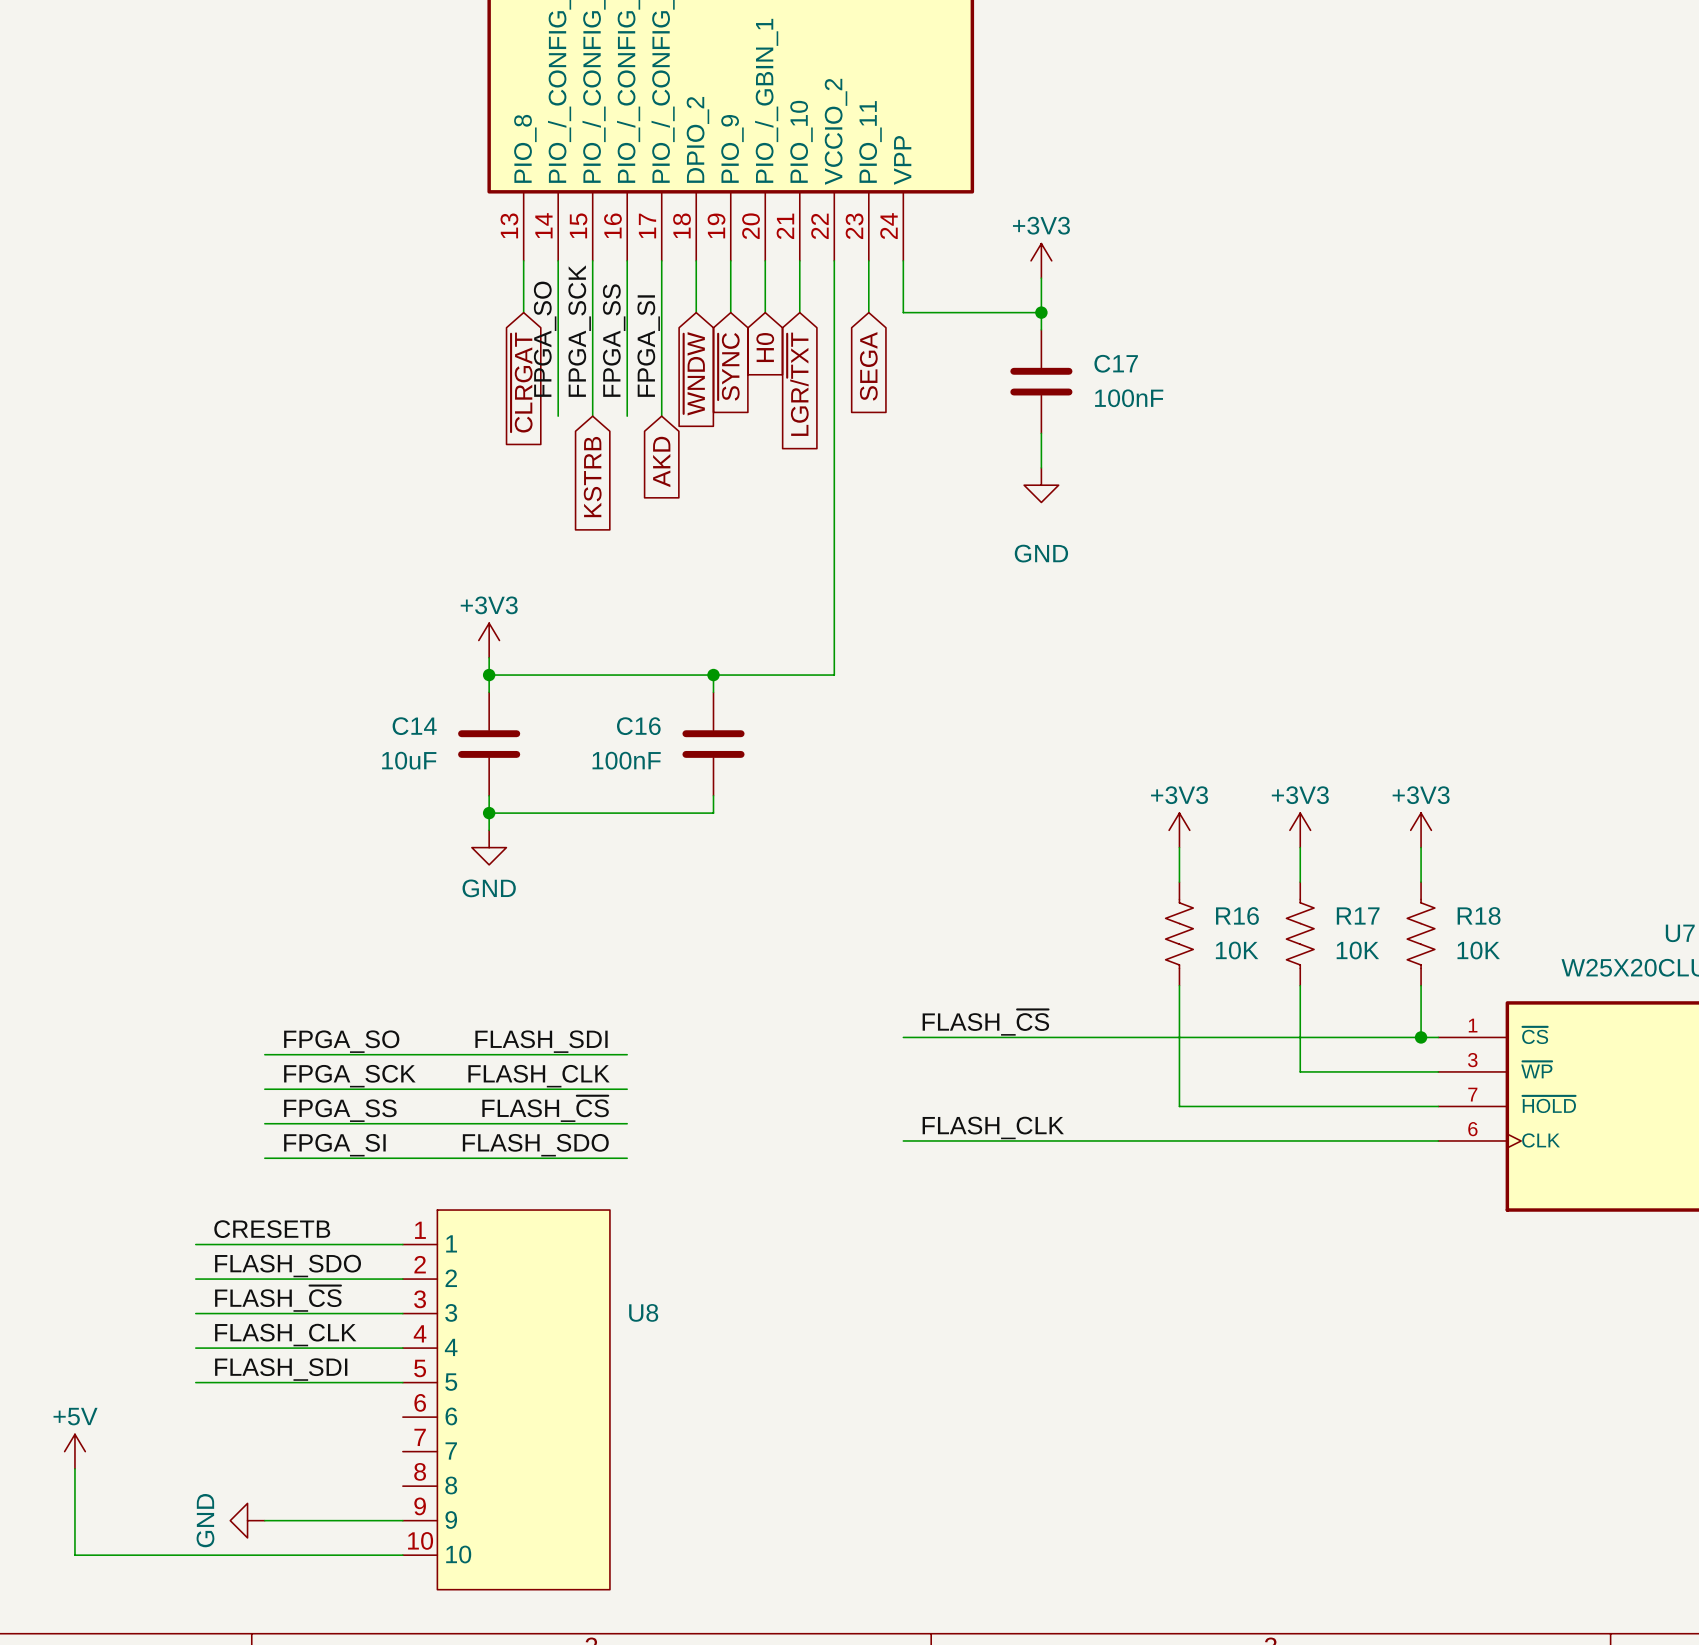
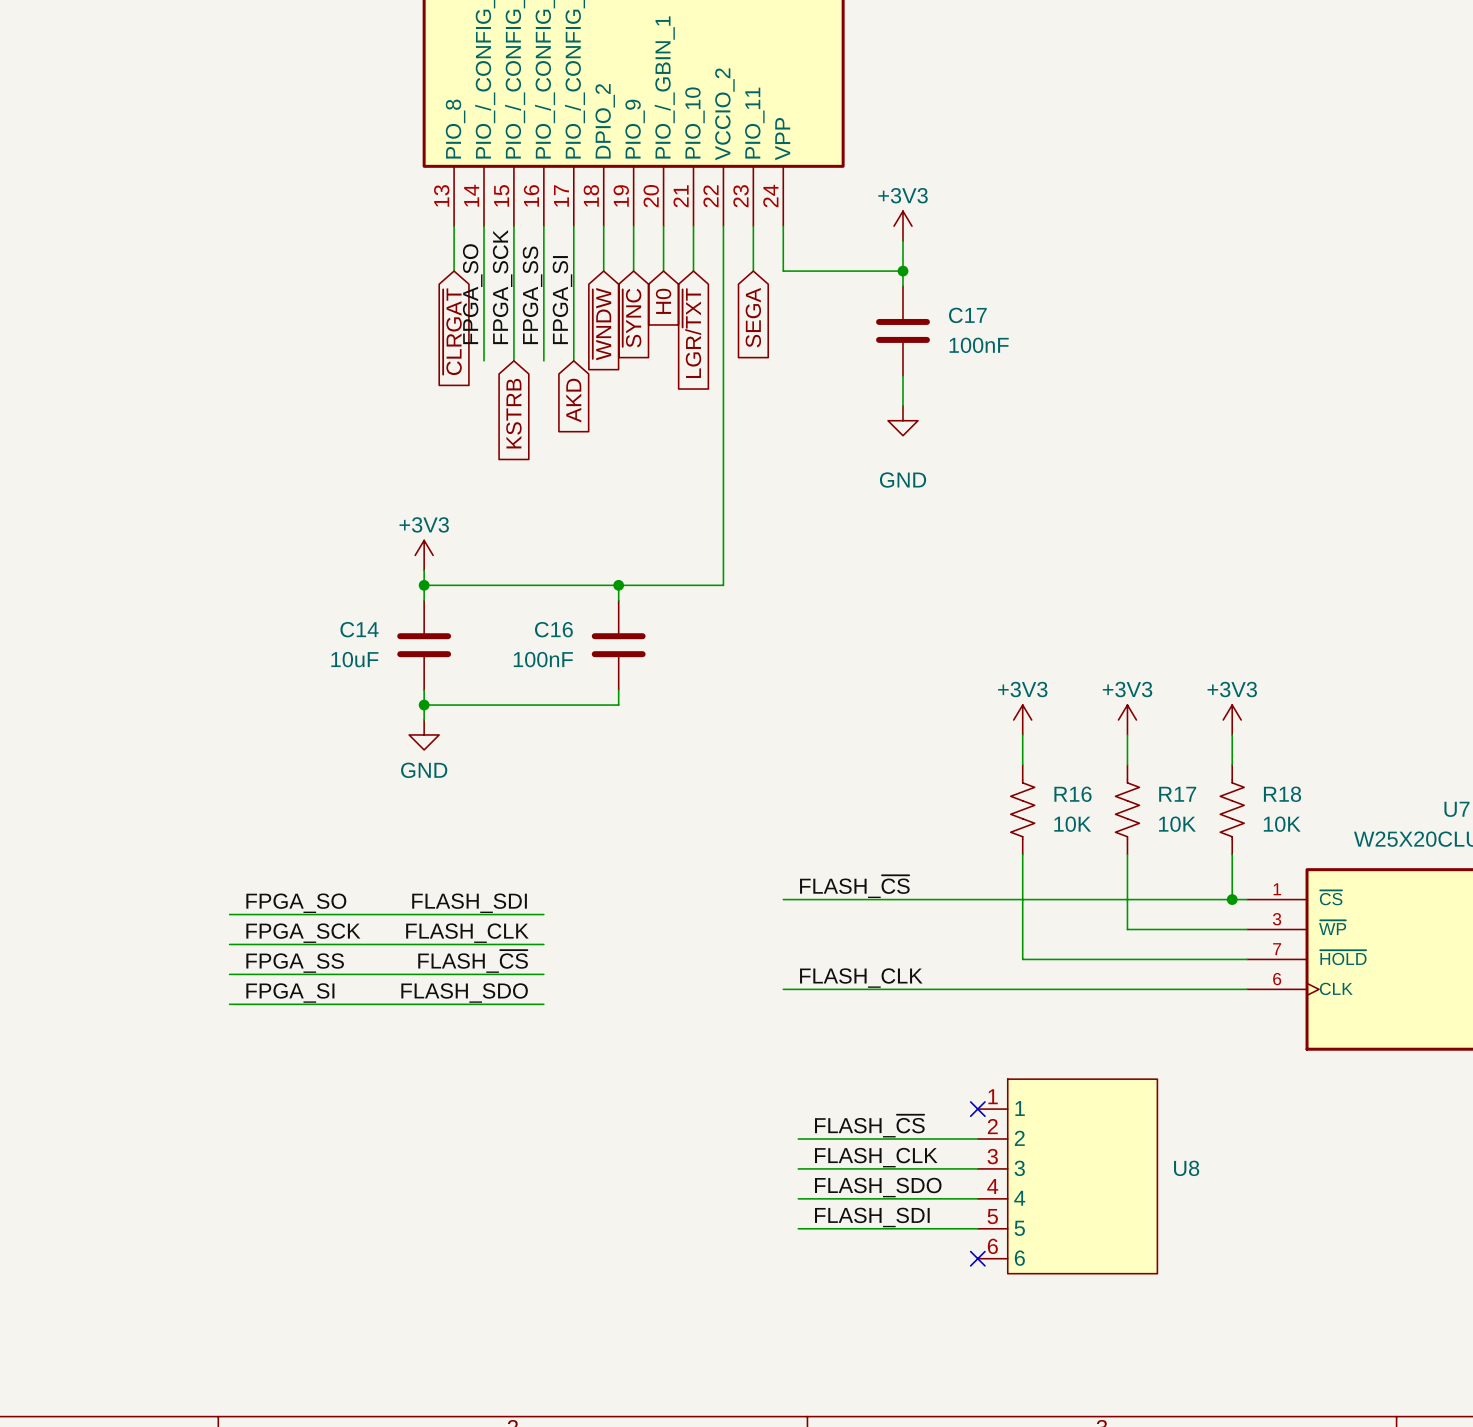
U8 symbol: [402, 1210, 610, 1590] -> [977, 1079, 1158, 1274]
label: CRESETB (272, 1229) -> none
wire: (195, 1244) (402, 1244) -> none
label: FLASH_SDO (288, 1266) -> none
wire: (195, 1279) (402, 1279) -> none
no-connect mark: none -> (977, 1109)
label: FLASH_~{CS} (278, 1298) -> none
label: none -> FLASH_~{CS} (869, 1126)
U8 name position: U8 (643, 1312) -> U8 (1186, 1168)
wire: (195, 1313) (402, 1313) -> none
wire: none -> (798, 1139) (977, 1139)
label: FLASH_CLK (285, 1335) -> none
label: none -> FLASH_CLK (876, 1157)
wire: (195, 1348) (402, 1348) -> none
wire: none -> (798, 1168) (977, 1168)
label: FLASH_SDI (281, 1369) -> none
label: none -> FLASH_SDO (878, 1187)
wire: (195, 1382) (402, 1382) -> none
wire: none -> (798, 1198) (977, 1198)
label: none -> FLASH_SDI (872, 1217)
wire: none -> (798, 1228) (977, 1228)
power symbol: +5V (74, 1451) -> none
no-connect mark: none -> (977, 1258)
wire: (74, 1468) (74, 1555) (402, 1555) -> none
power symbol: GND (247, 1520) -> none
wire: (264, 1520) (402, 1520) -> none

